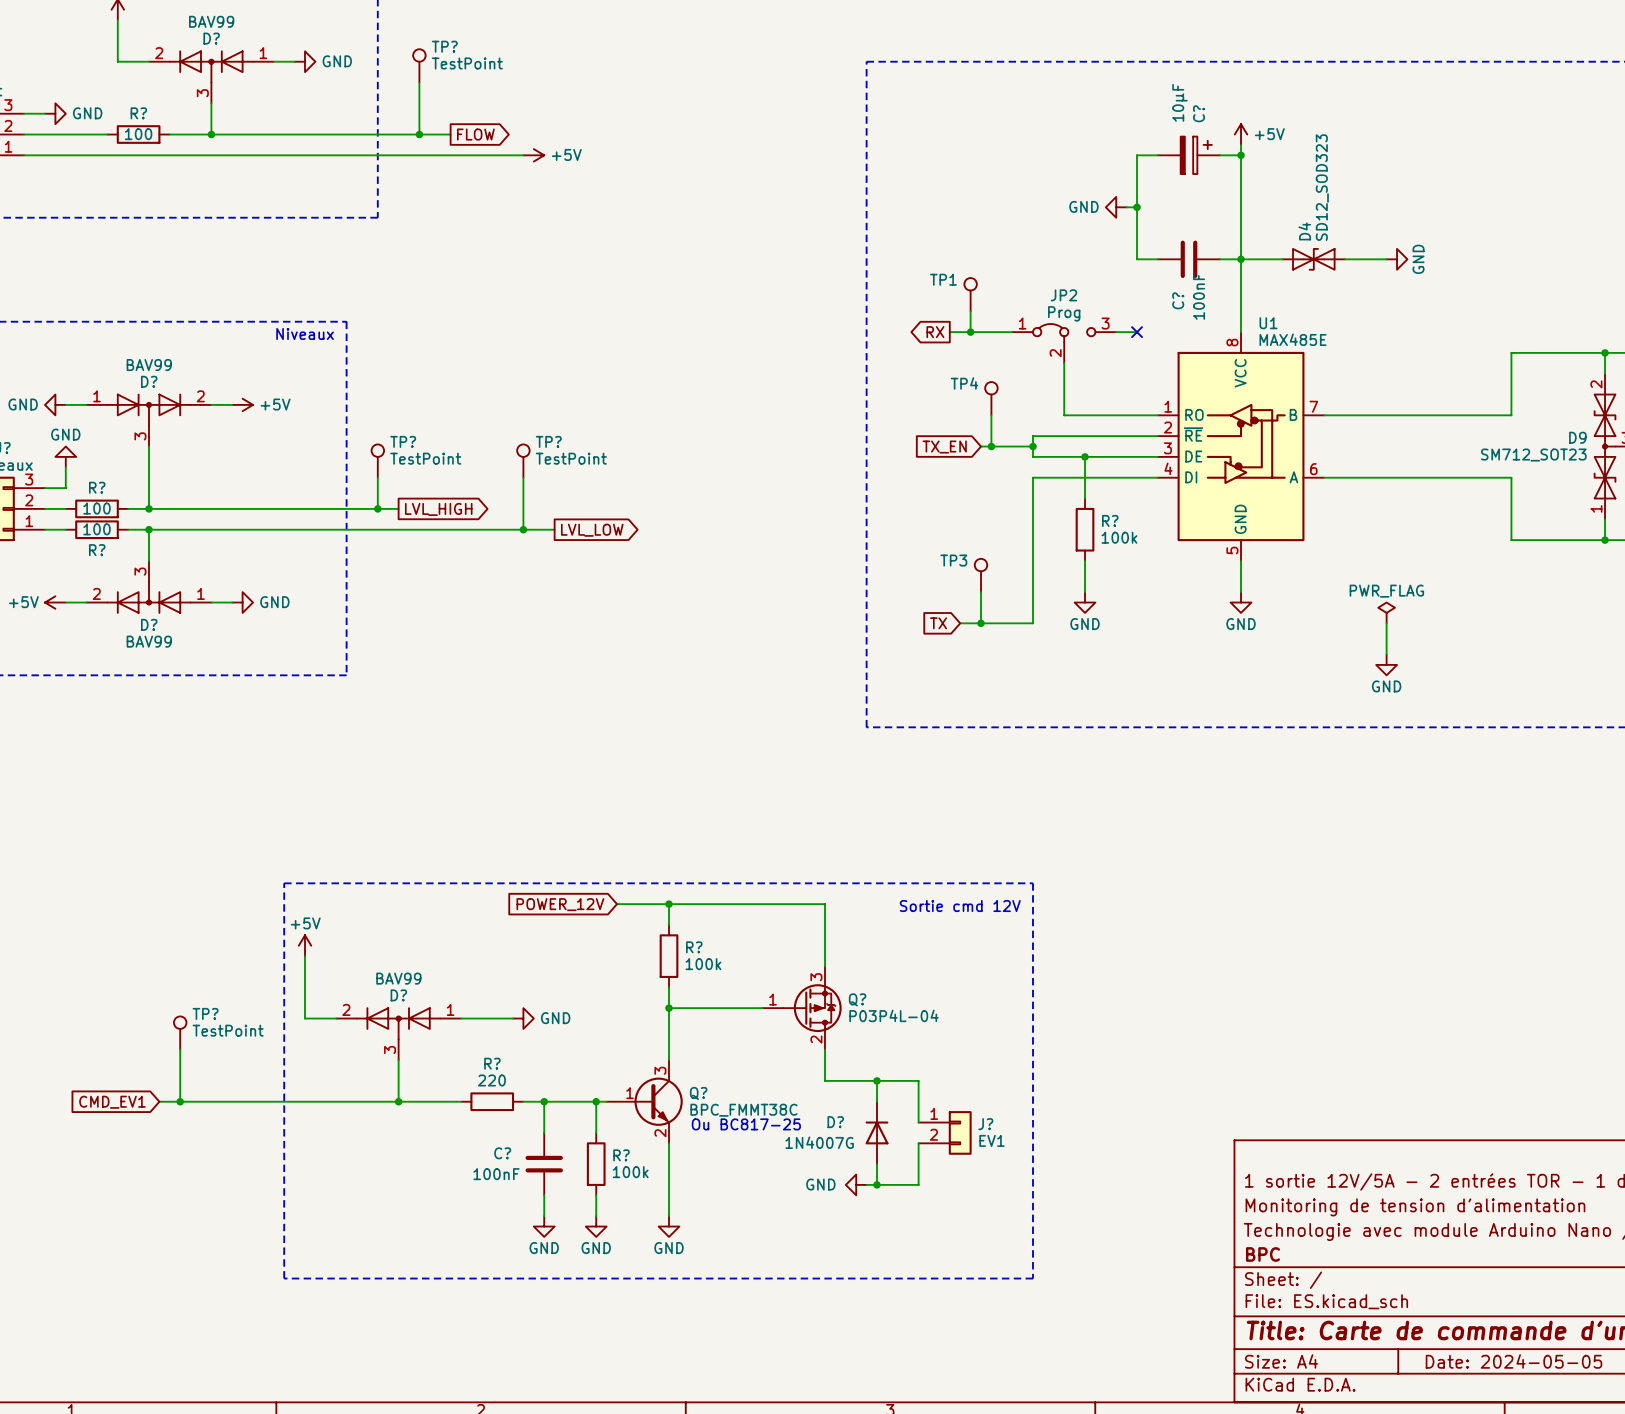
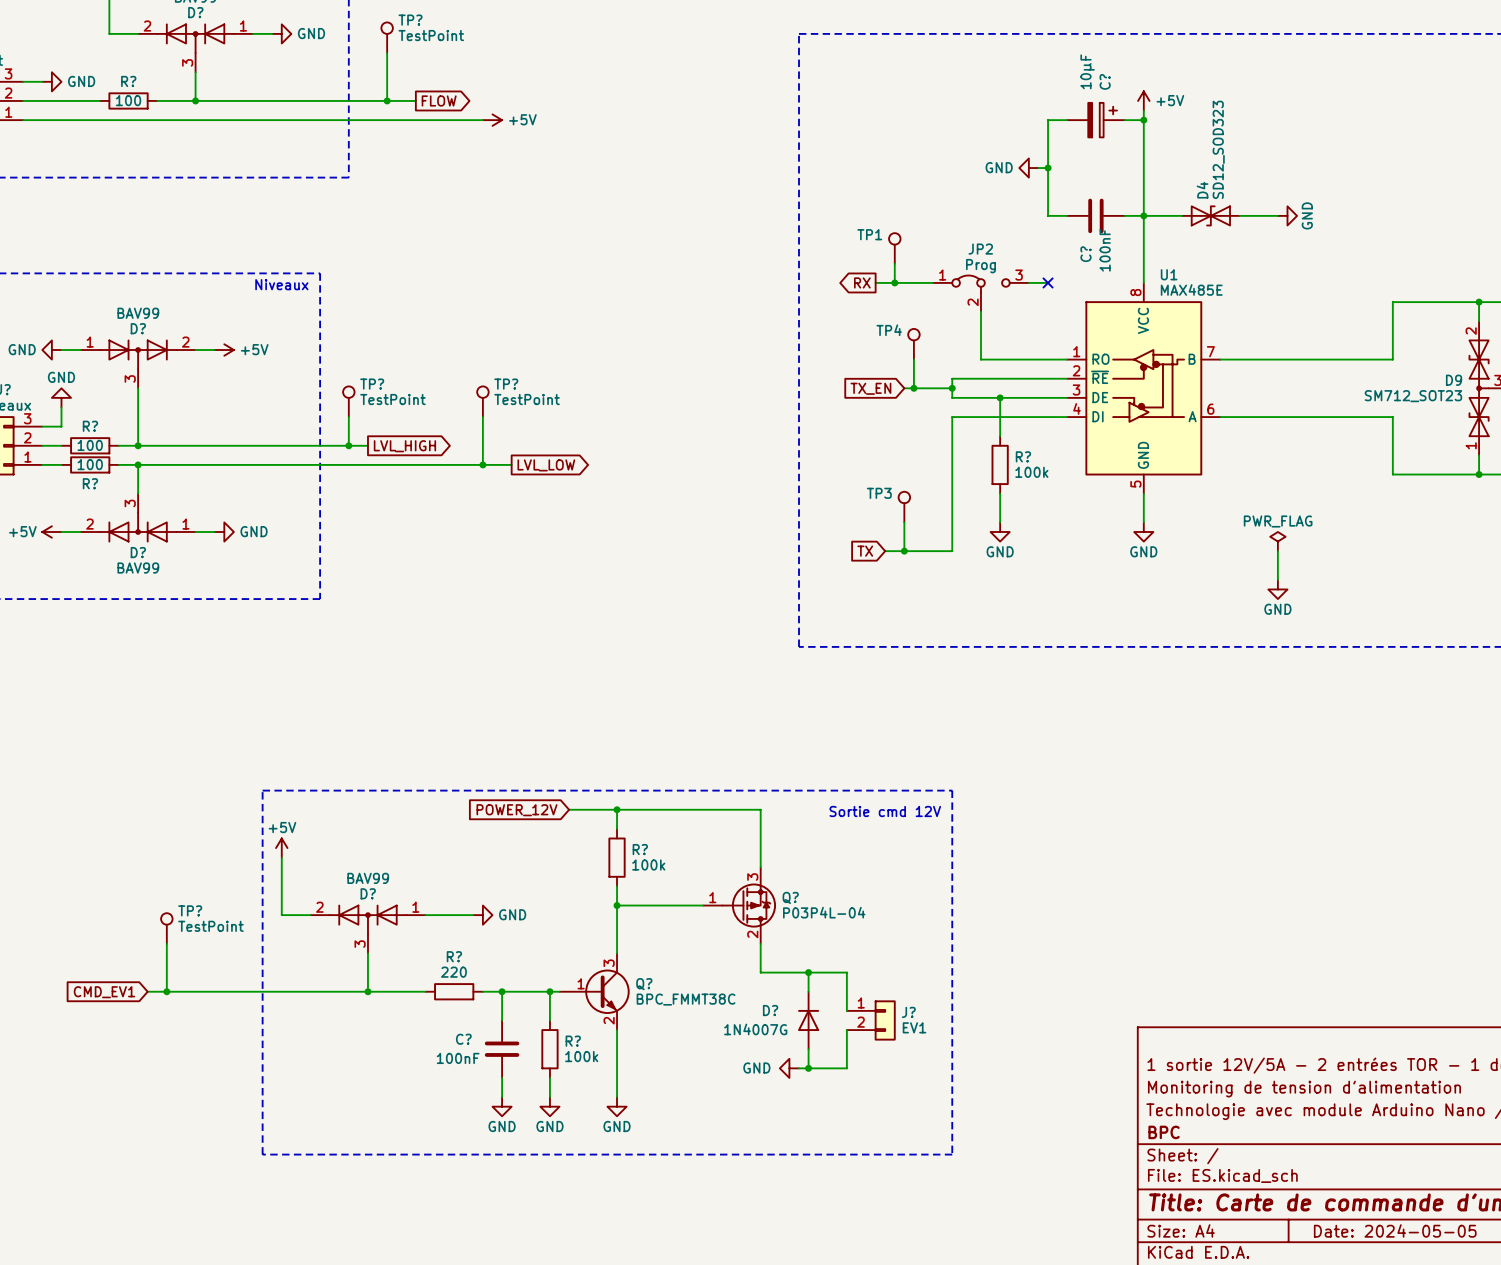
text: Ou BC817-25 (746, 1124) -> none

